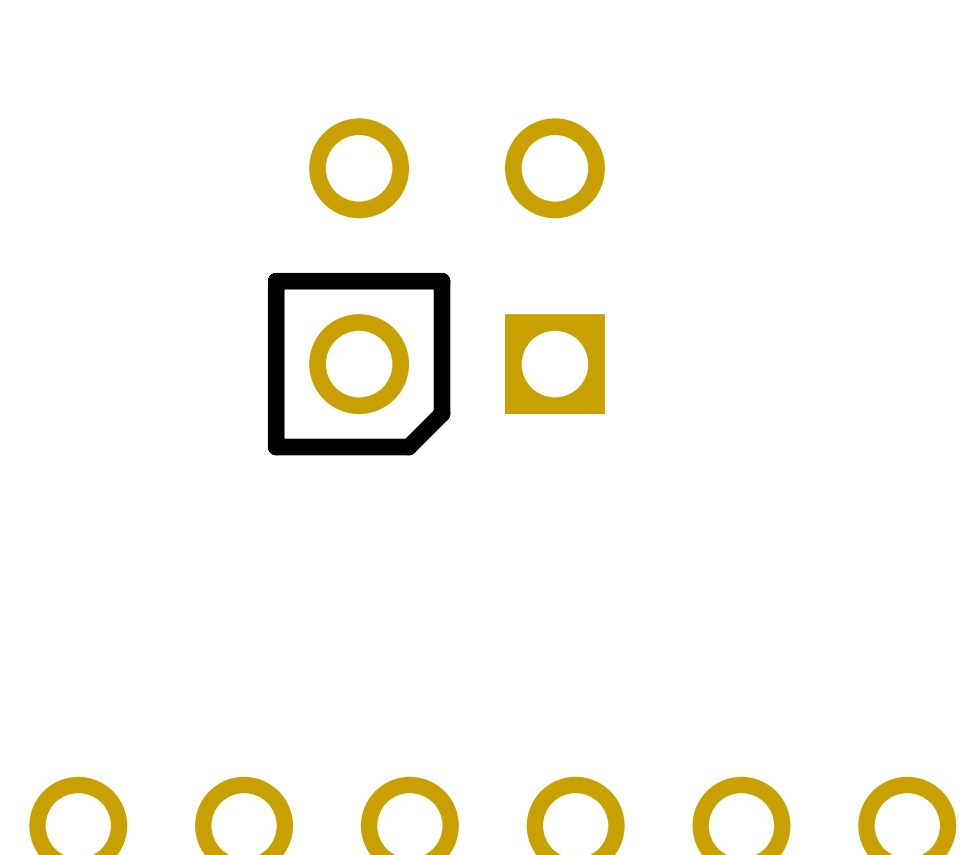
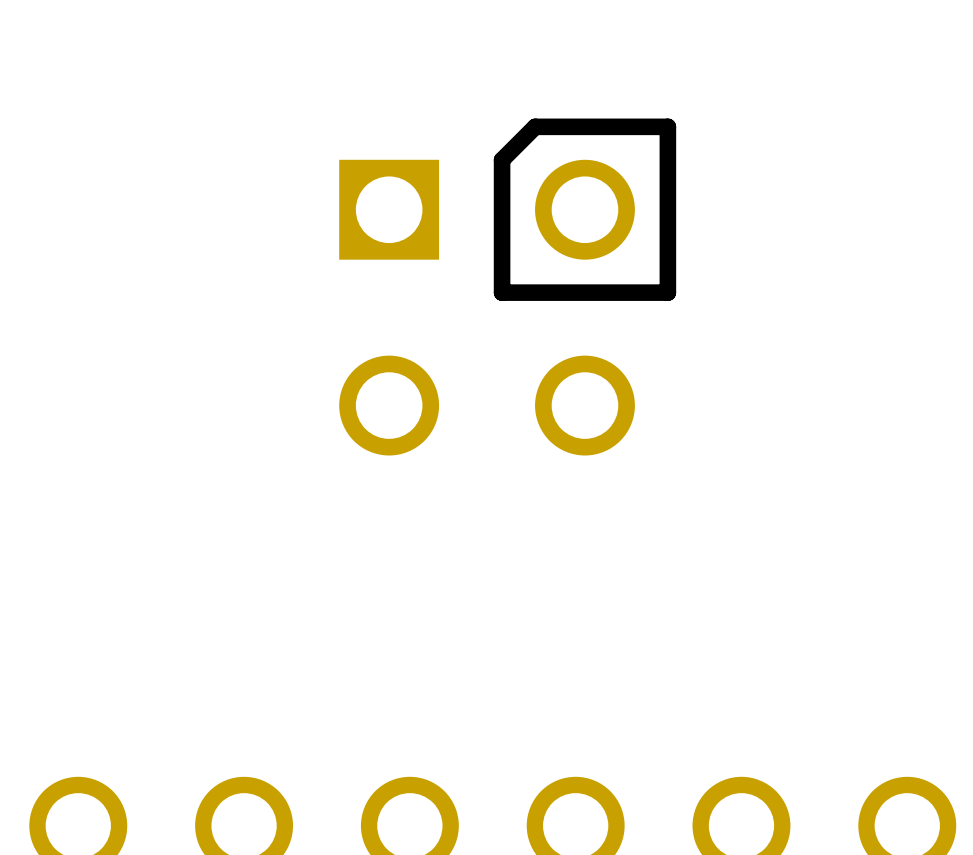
part rotation: 0° (436, 286) -> 180° (507, 287)

